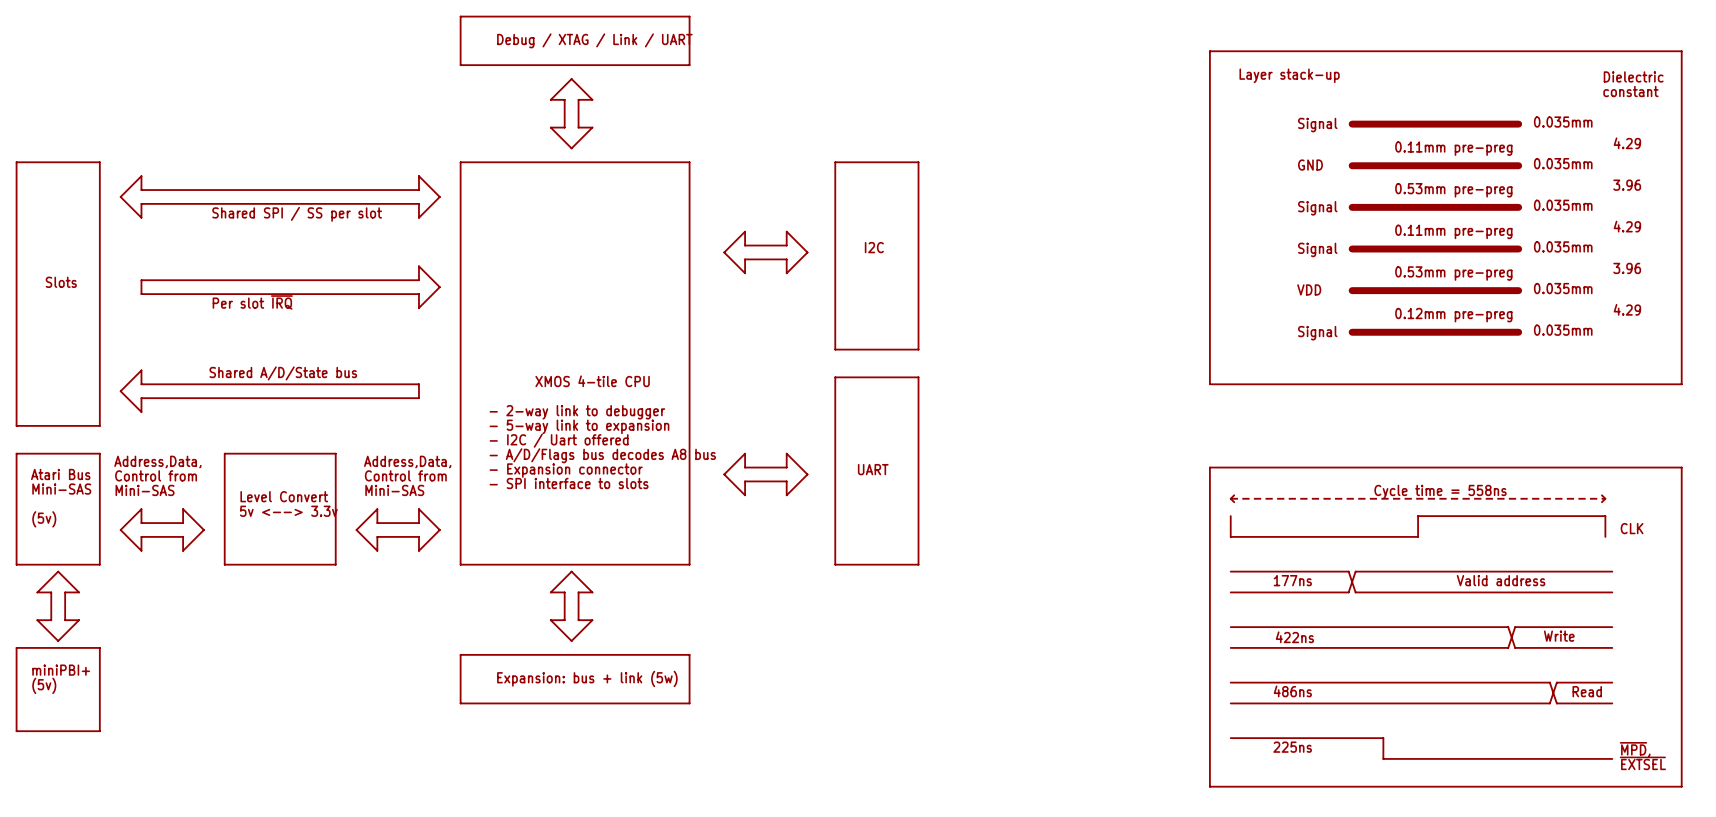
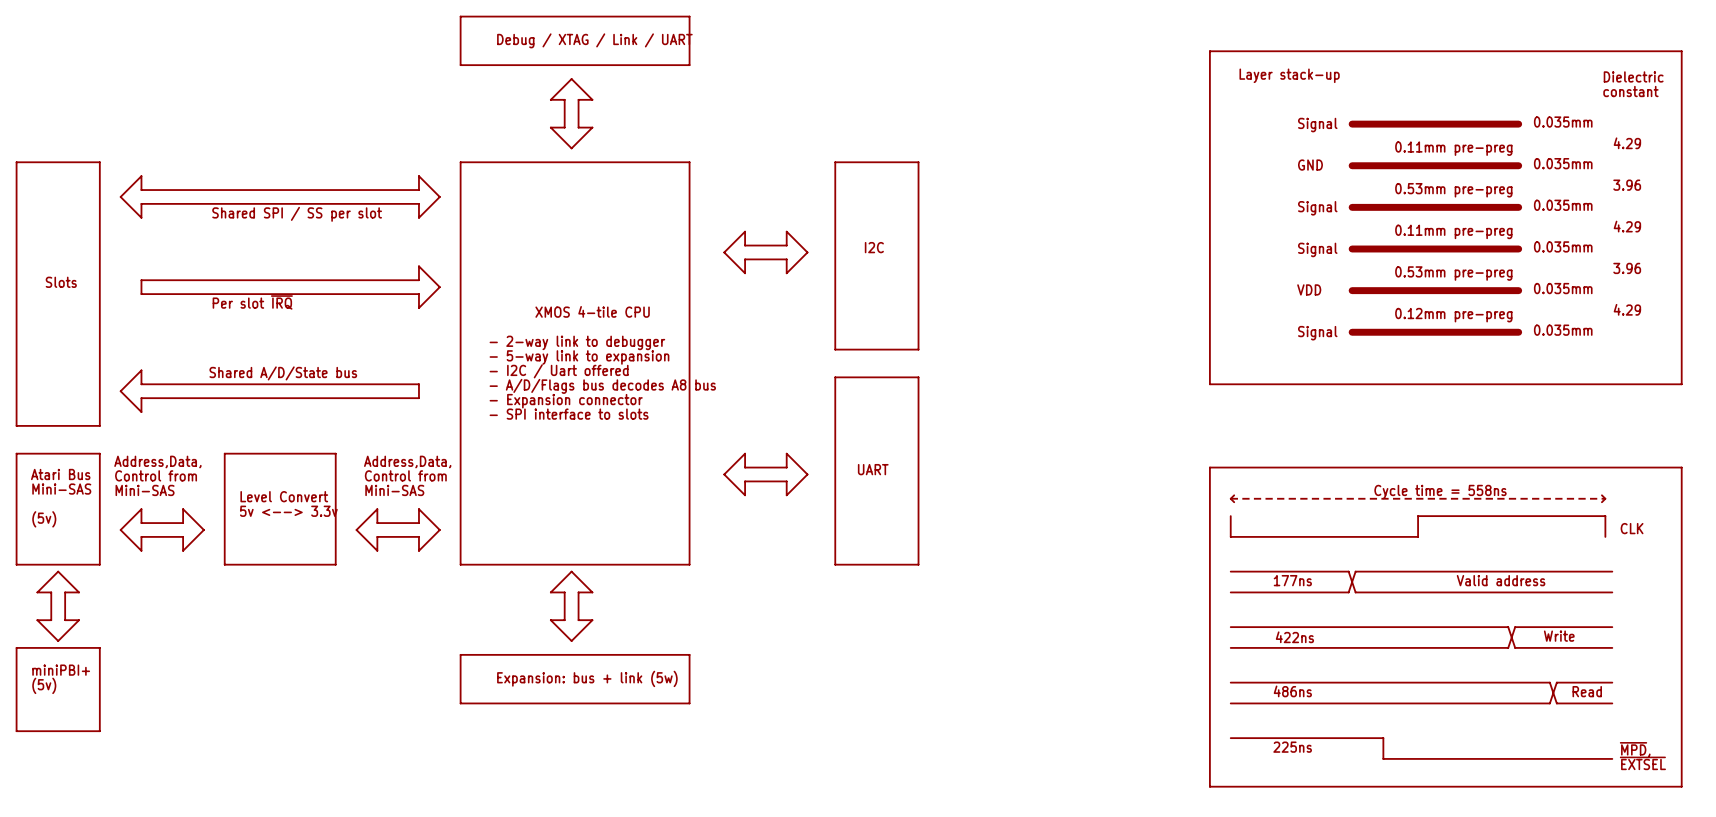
text position: XMOS 4-tile CPU (592, 381) -> XMOS 4-tile CPU (592, 311)
text position: - 2-way link to debugger (577, 412) -> - 2-way link to debugger (577, 342)
text position: - 5-way link to expansion (579, 426) -> - 5-way link to expansion (579, 357)
text position: - I2C / Uart offered (559, 440) -> - I2C / Uart offered (559, 371)
text position: - A/D/Flags bus decodes A8 bus (602, 455) -> - A/D/Flags bus decodes A8 bus (602, 386)
text position: - Expansion connector (566, 470) -> - Expansion connector (566, 401)
text position: - SPI interface to slots (569, 483) -> - SPI interface to slots (569, 414)

